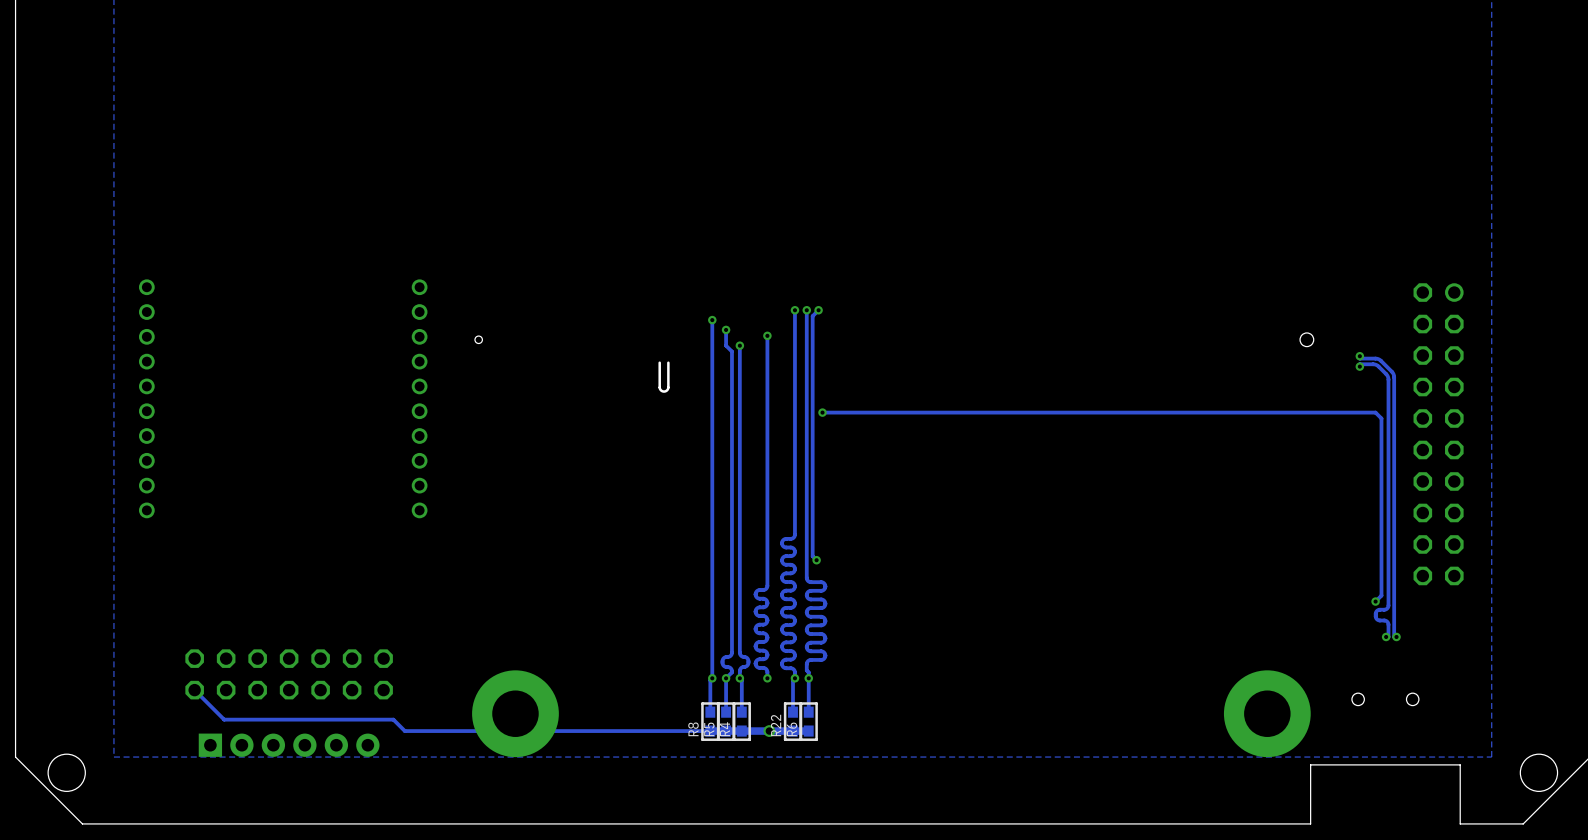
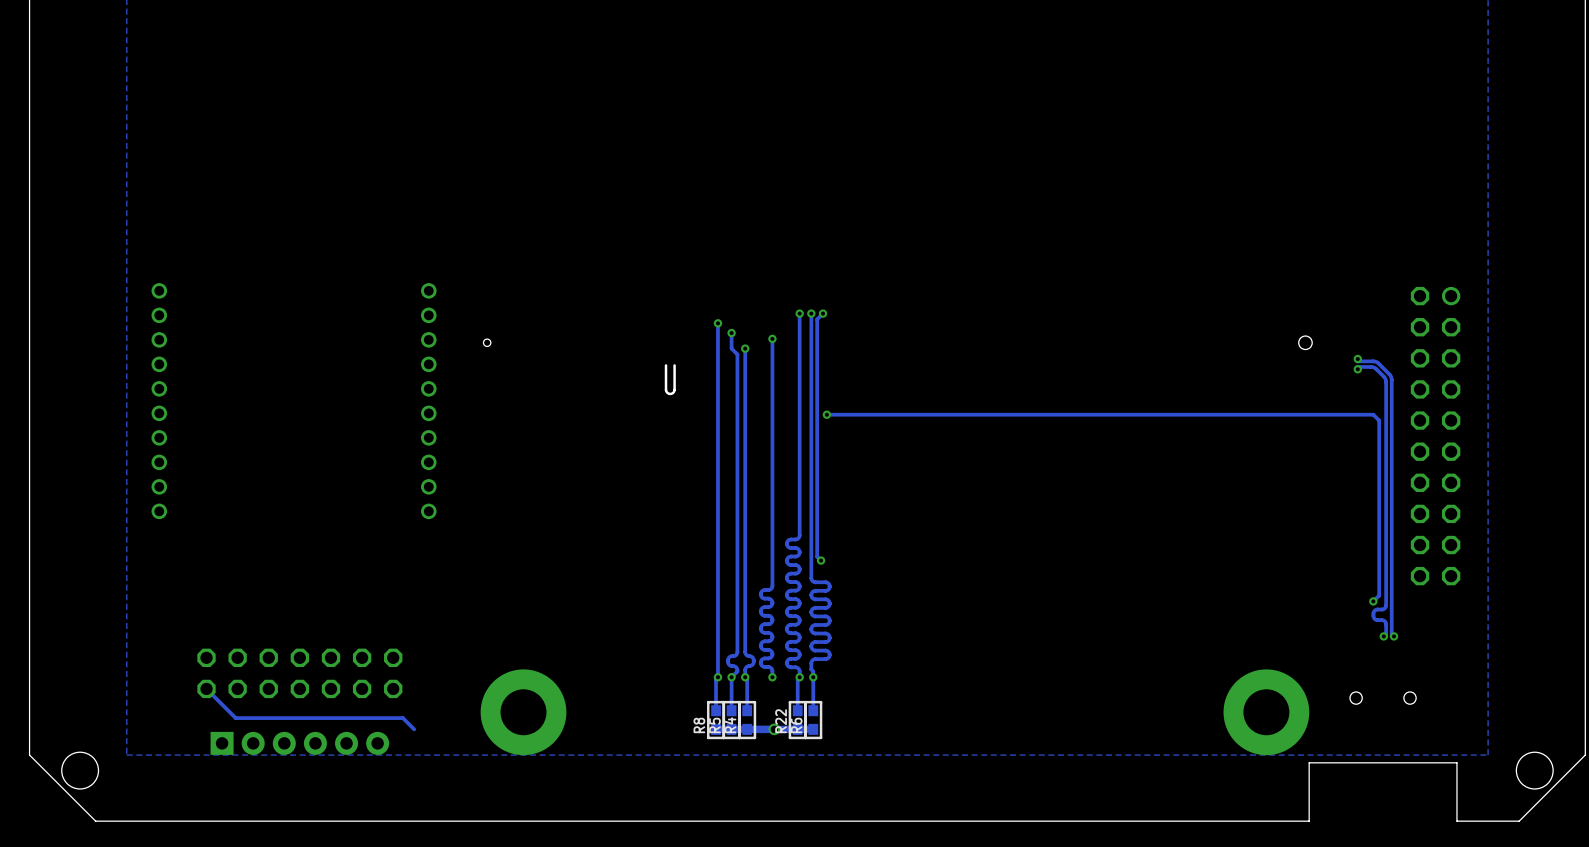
track: (710, 731) (404, 731) -> none

